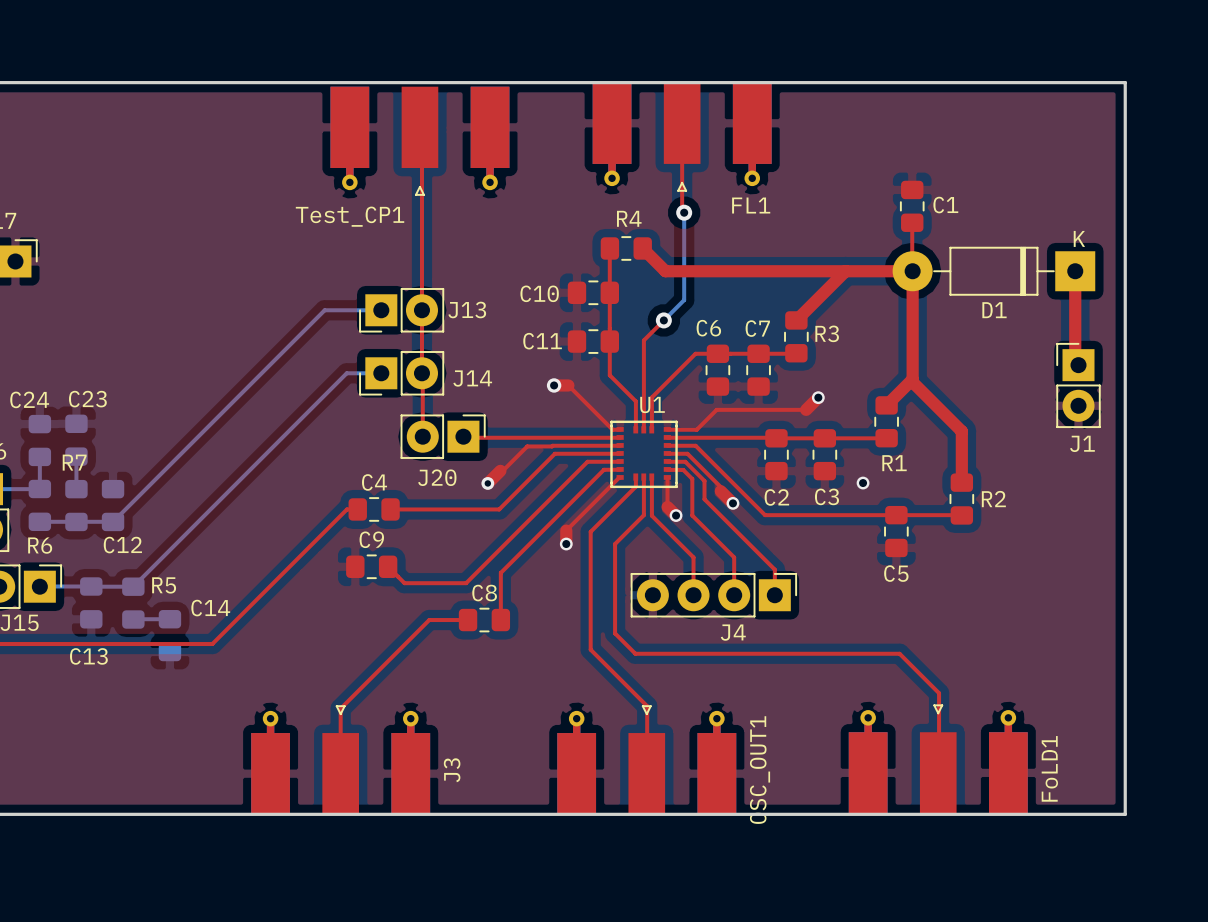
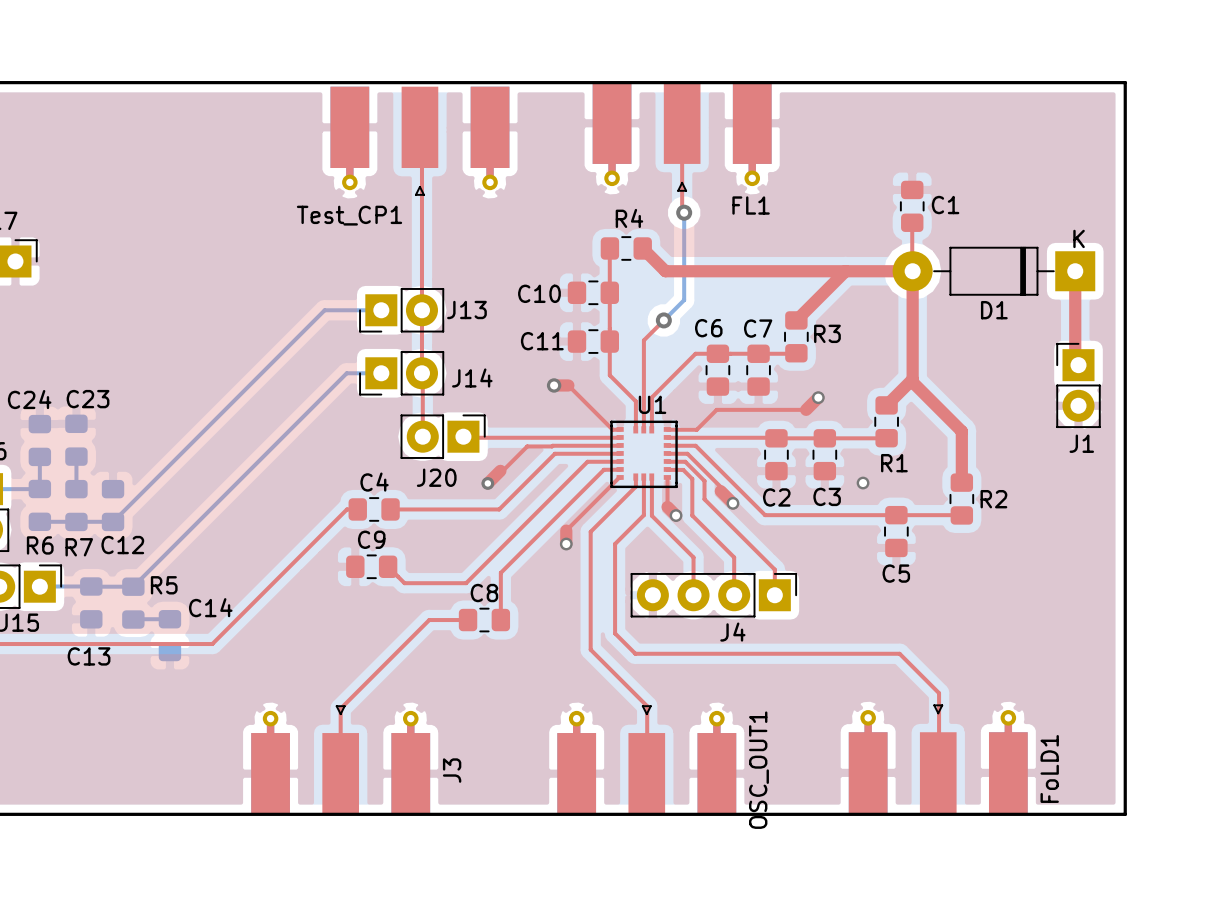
R7 name position: R7 (74, 462) -> R7 (79, 547)

